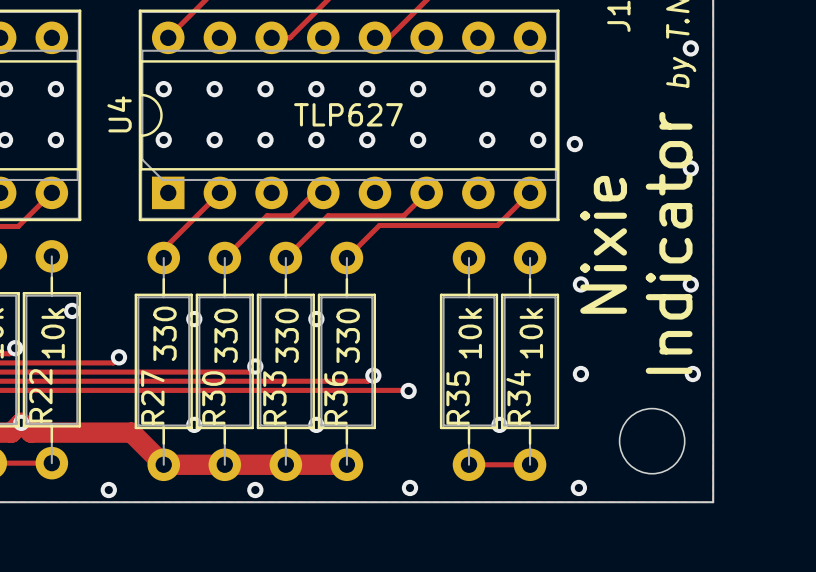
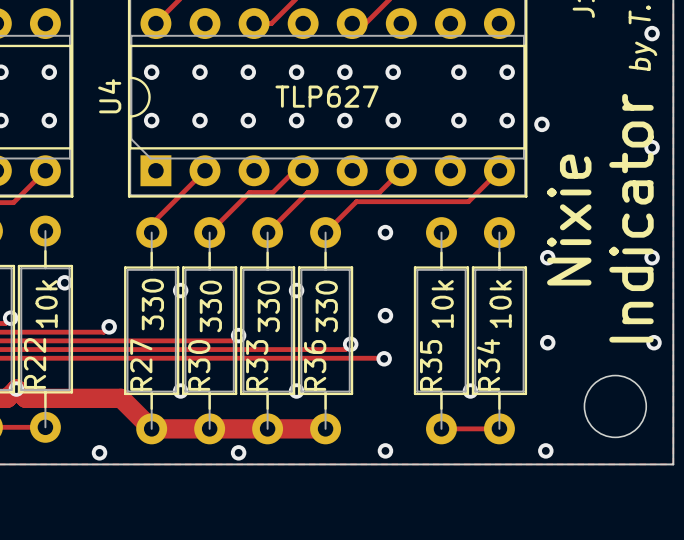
via: none -> (385, 232)
via: none -> (385, 315)

